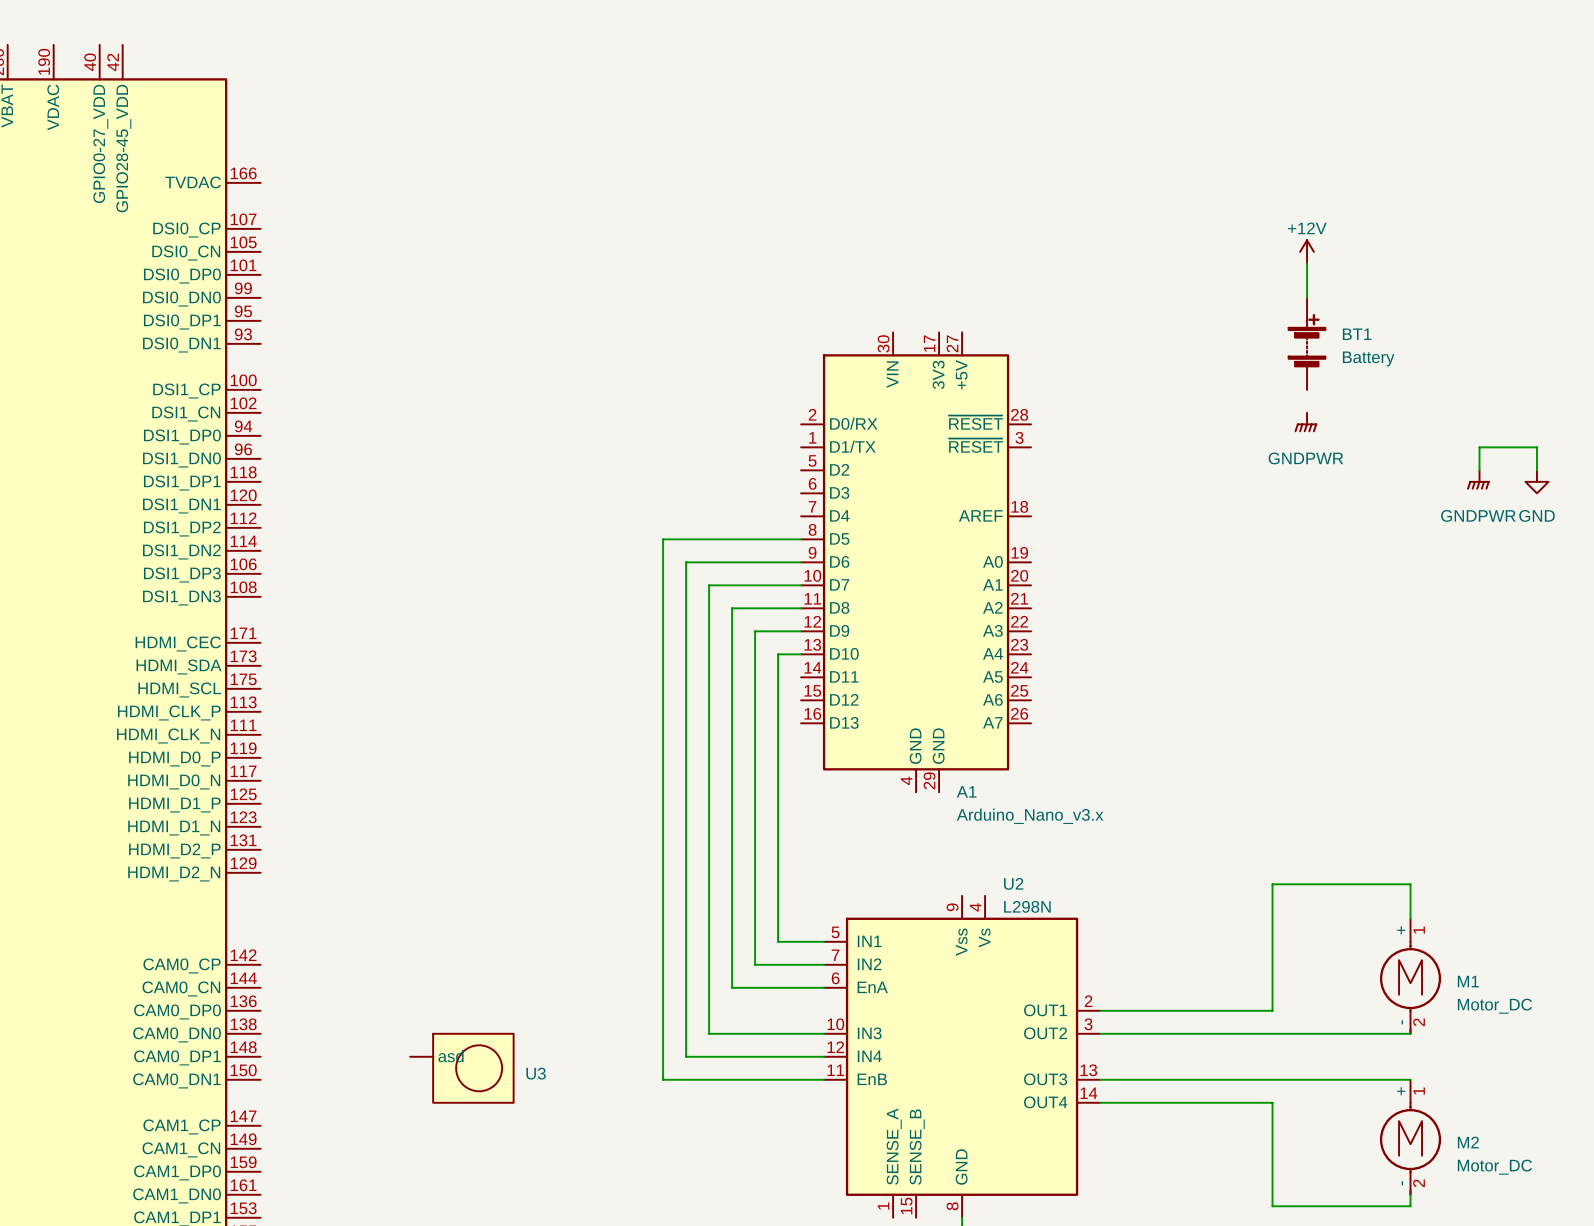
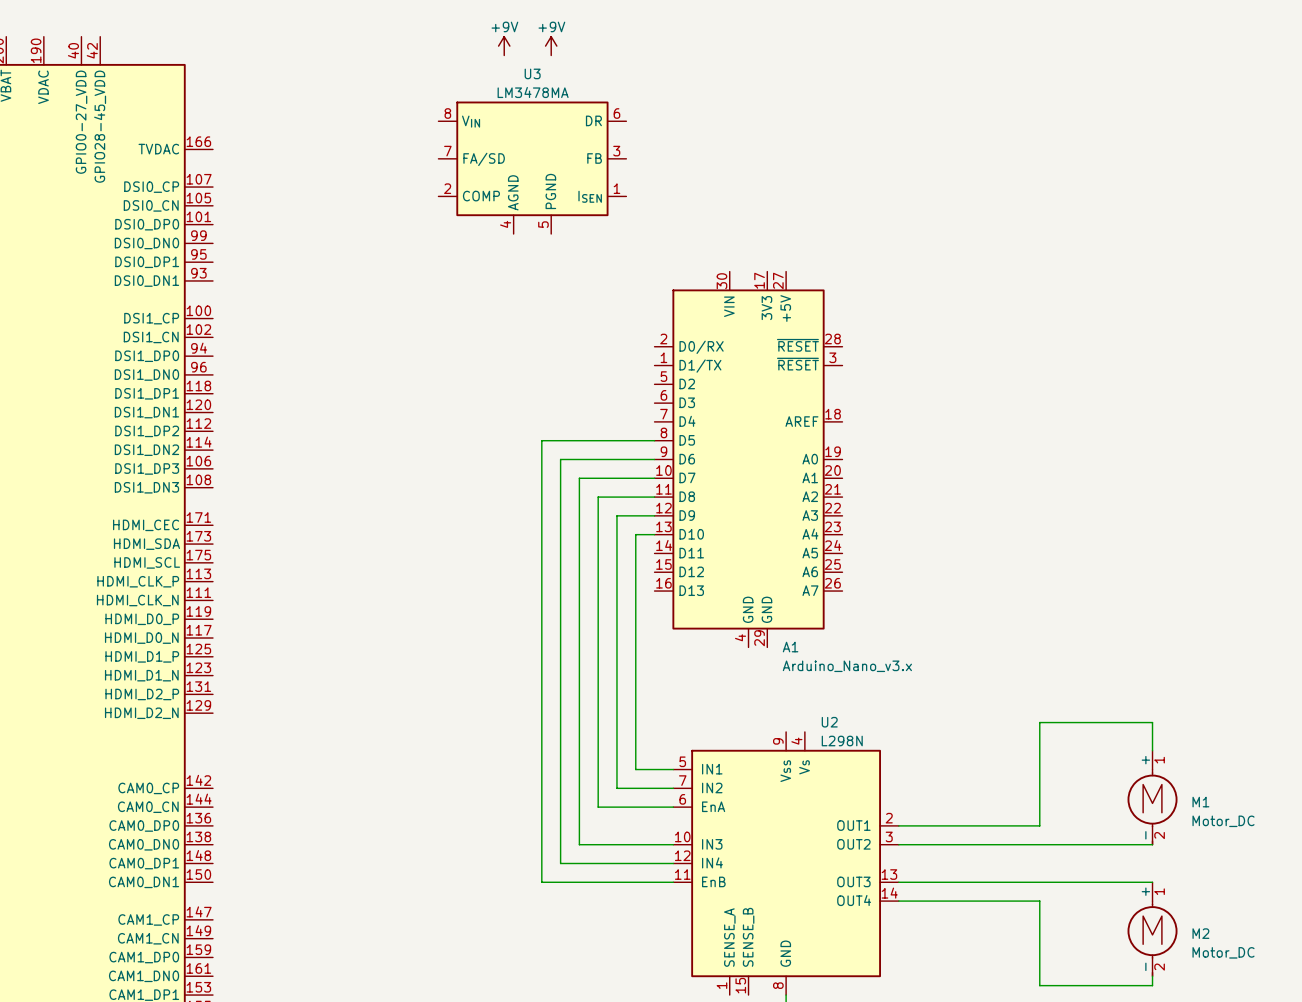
power symbol: none -> +9V (504, 46)
power symbol: none -> +9V (551, 46)
U3 value: none -> LM3478MA (533, 92)
power symbol: +12V (1307, 251) -> none
wire: (1307, 263) (1307, 297) -> none
BT1: Battery (1307, 343) -> none
power symbol: GNDPWR (1305, 422) -> none
wire: (1479, 470) (1479, 447) (1536, 447) (1536, 470) -> none
power symbol: GNDPWR (1478, 480) -> none
power symbol: GND (1536, 481) -> none
U3 symbol: [410, 1033, 514, 1103] -> [438, 101, 627, 235]
U3 name position: U3 (536, 1073) -> U3 (532, 73)

